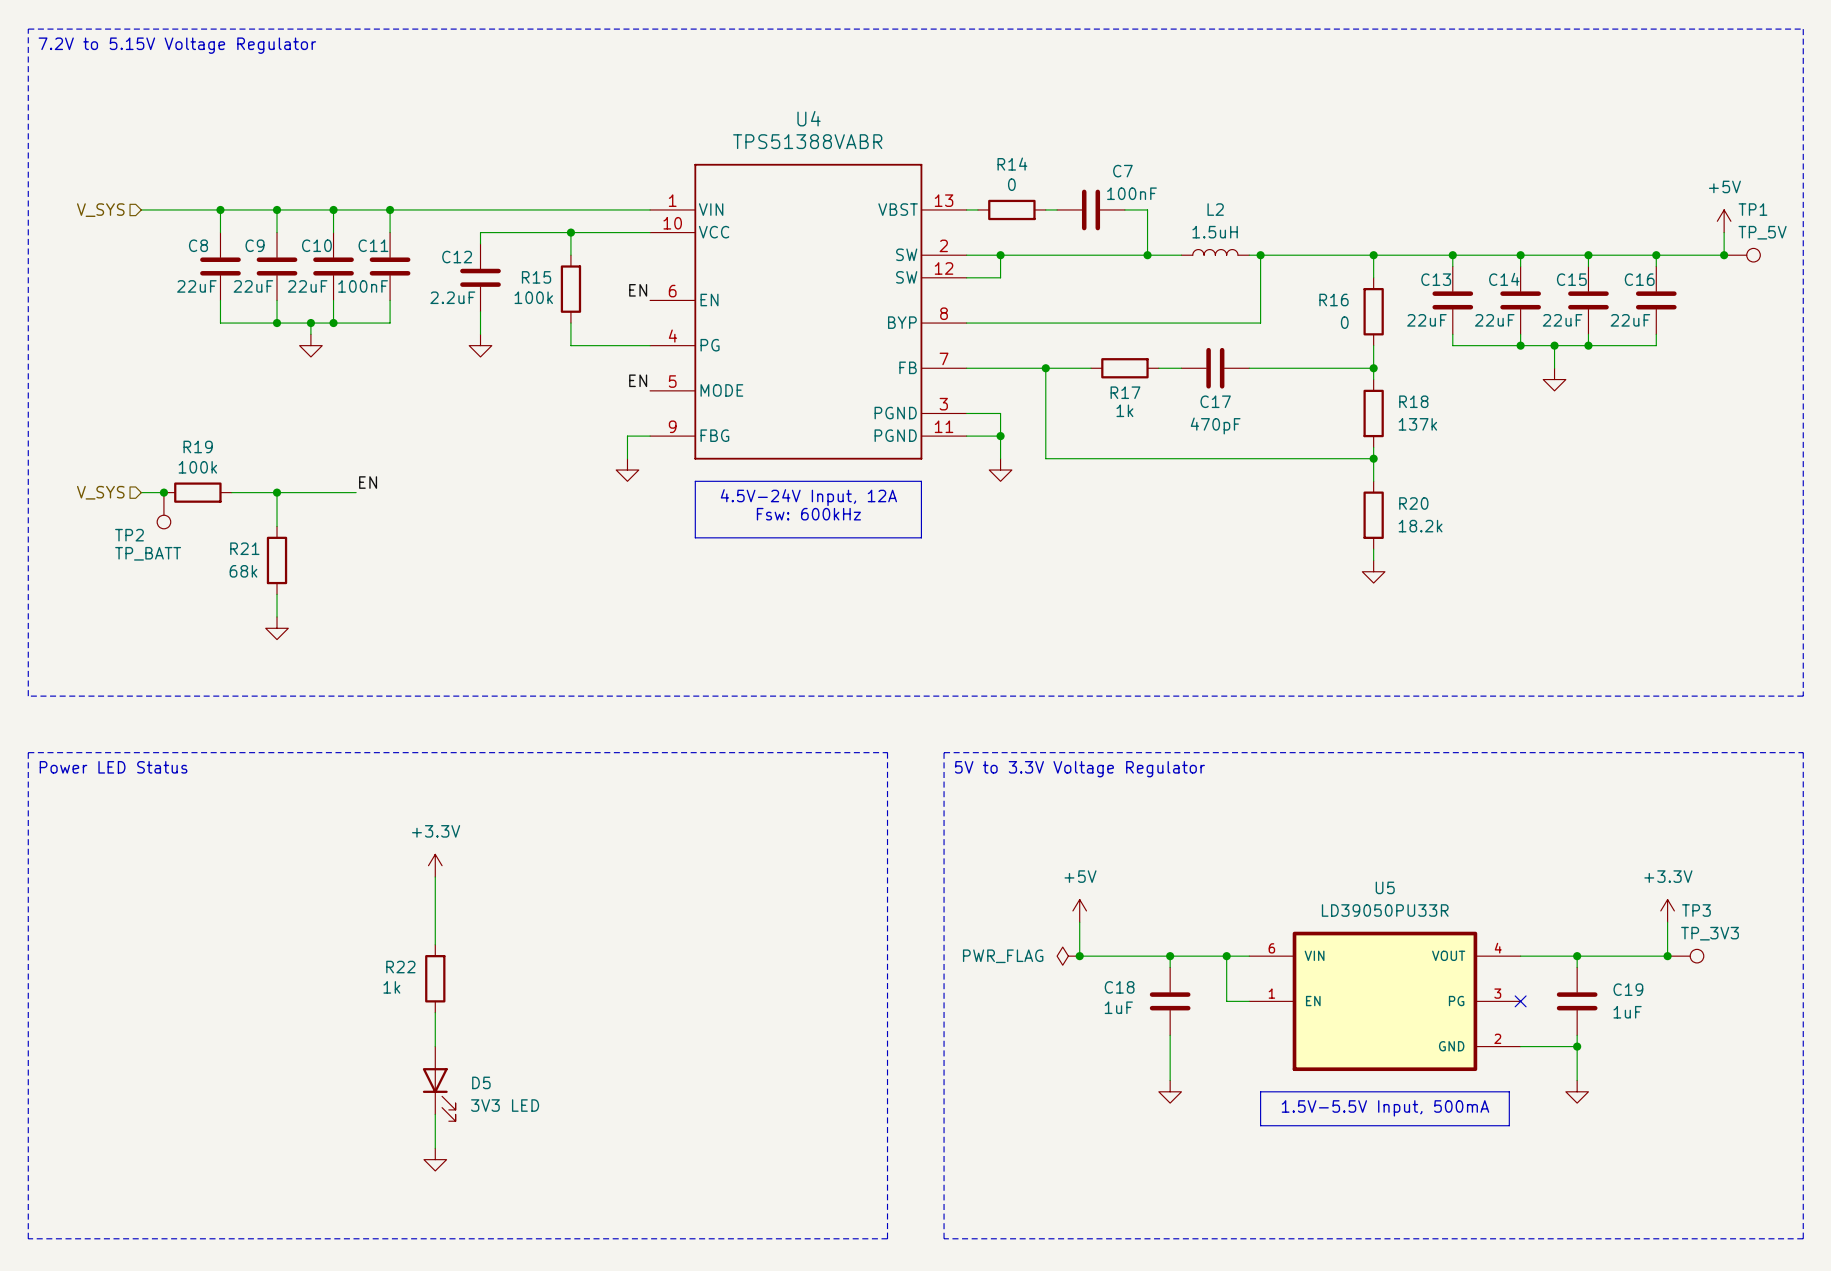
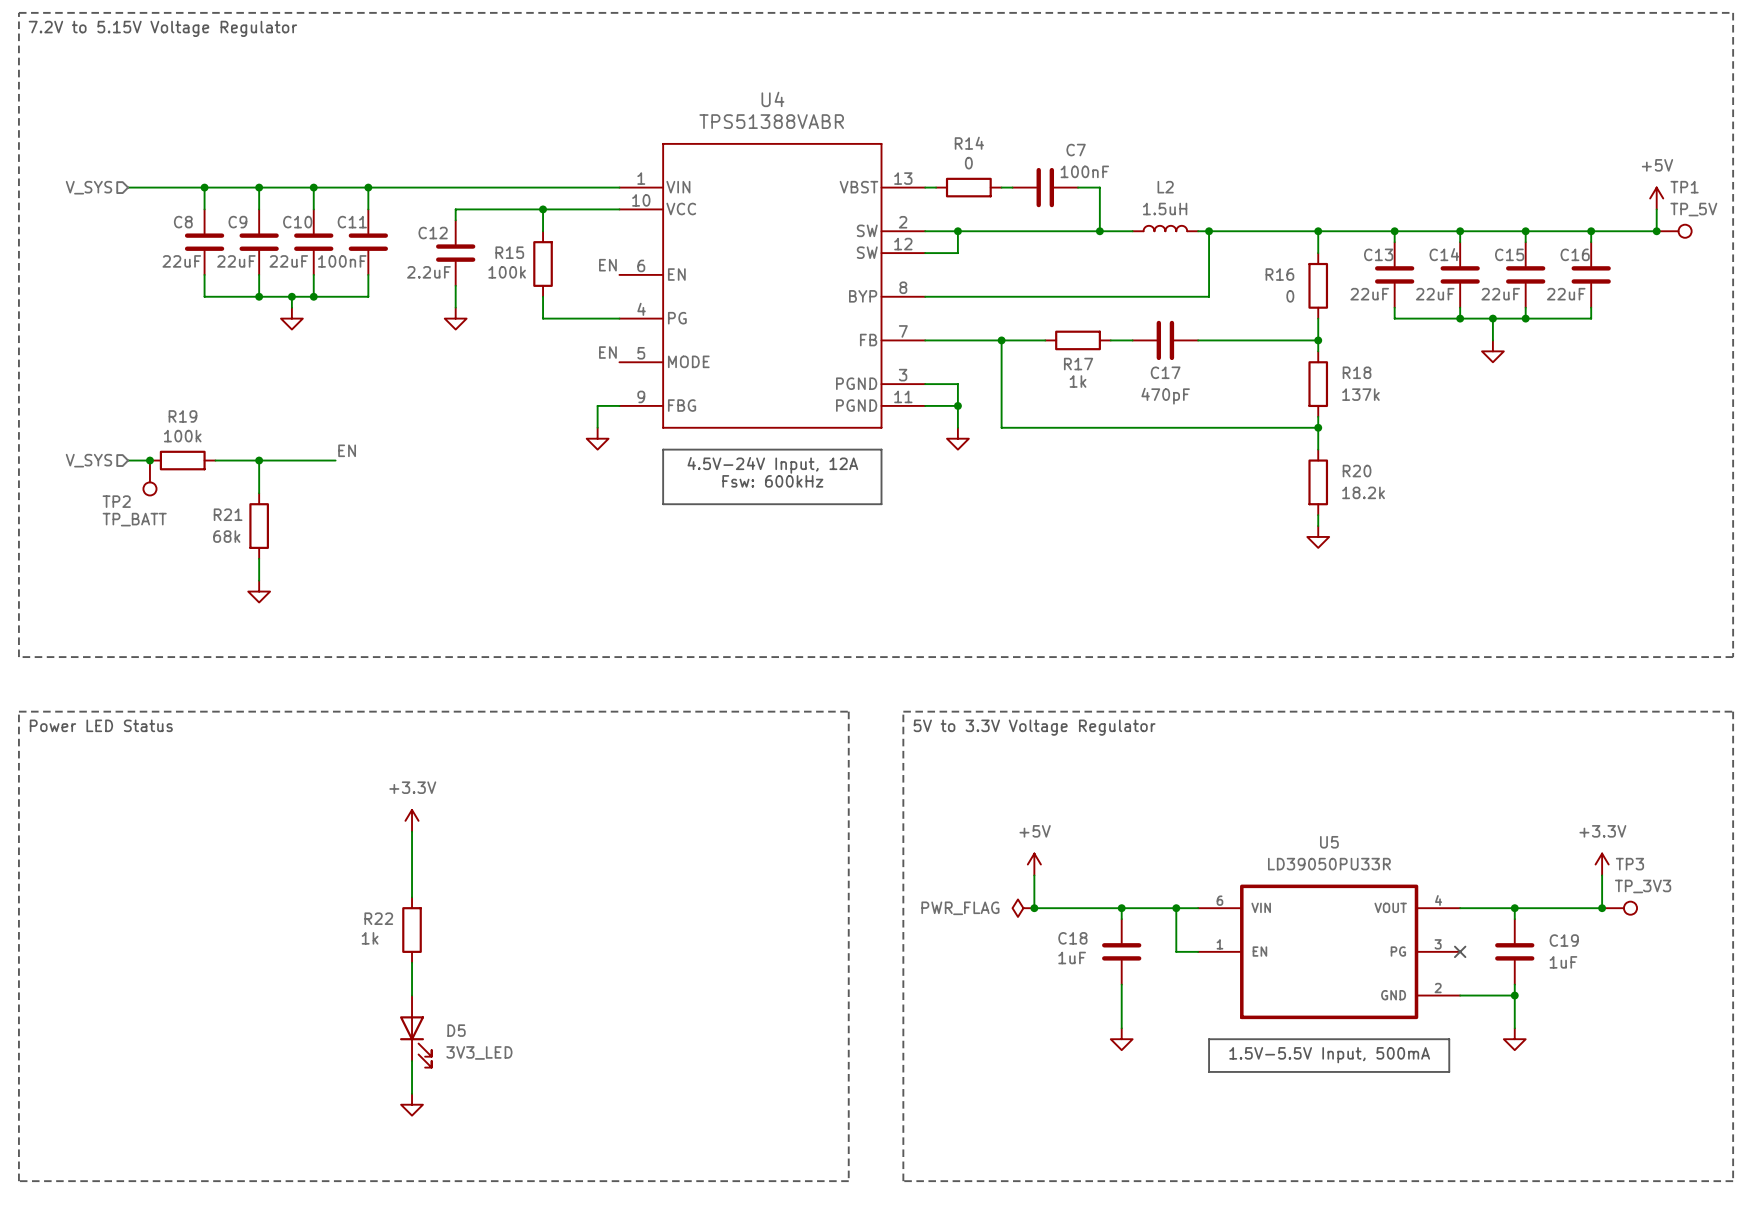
D5 value: 3V3 LED (505, 1105) -> 3V3_LED (479, 1052)

